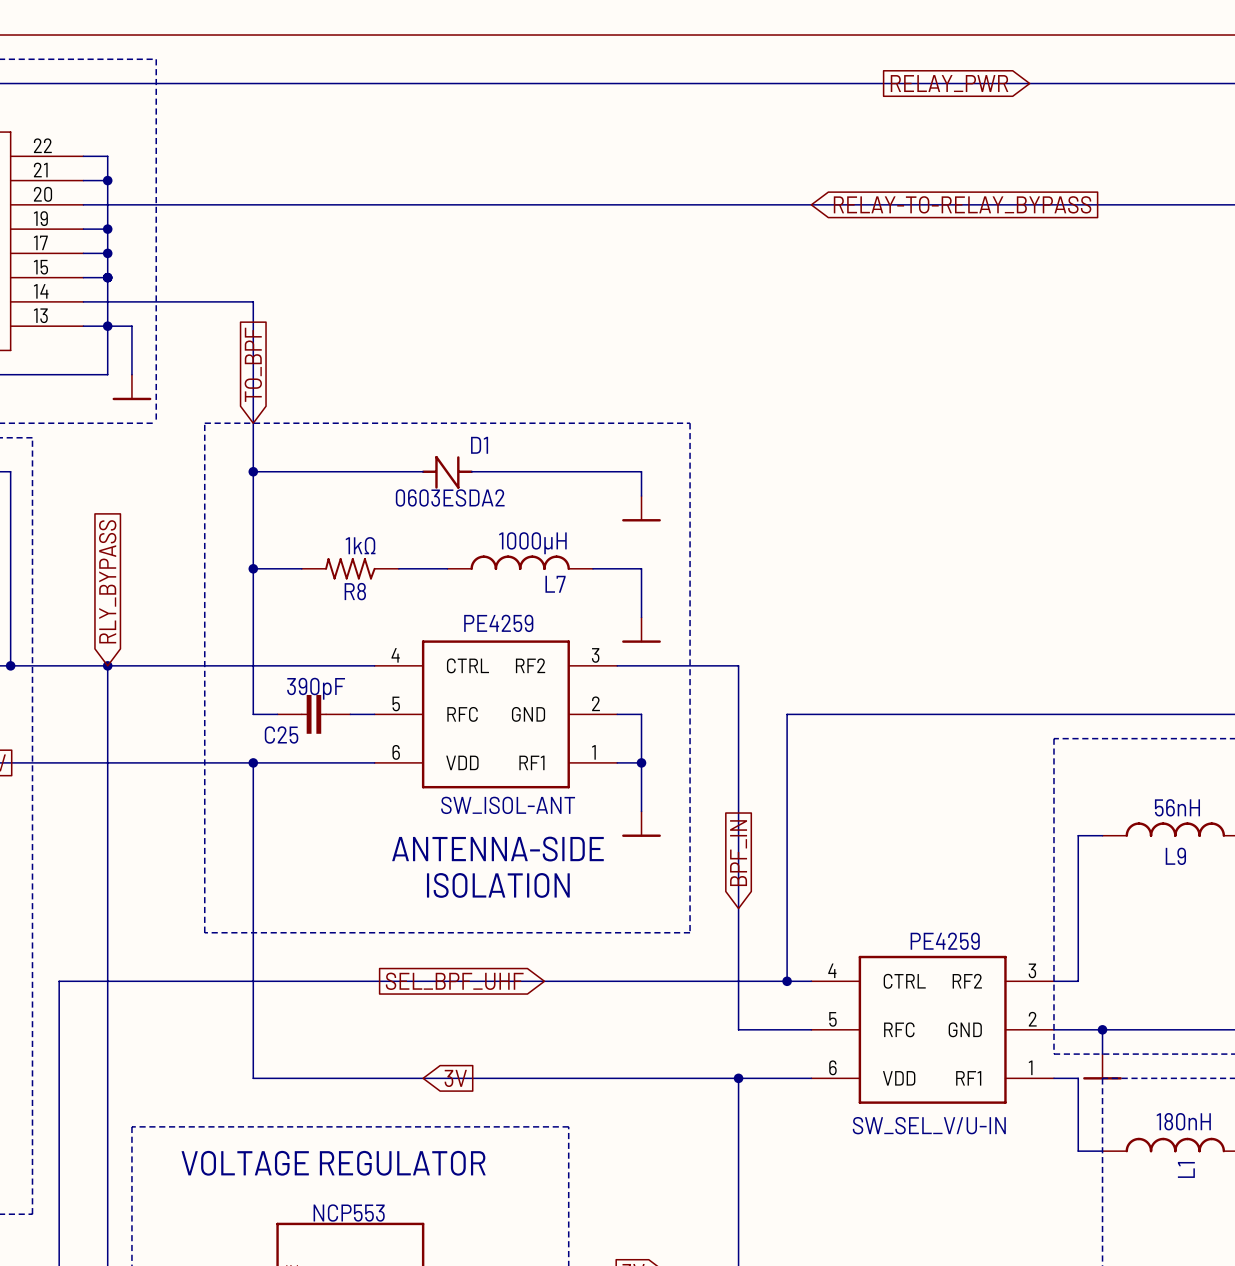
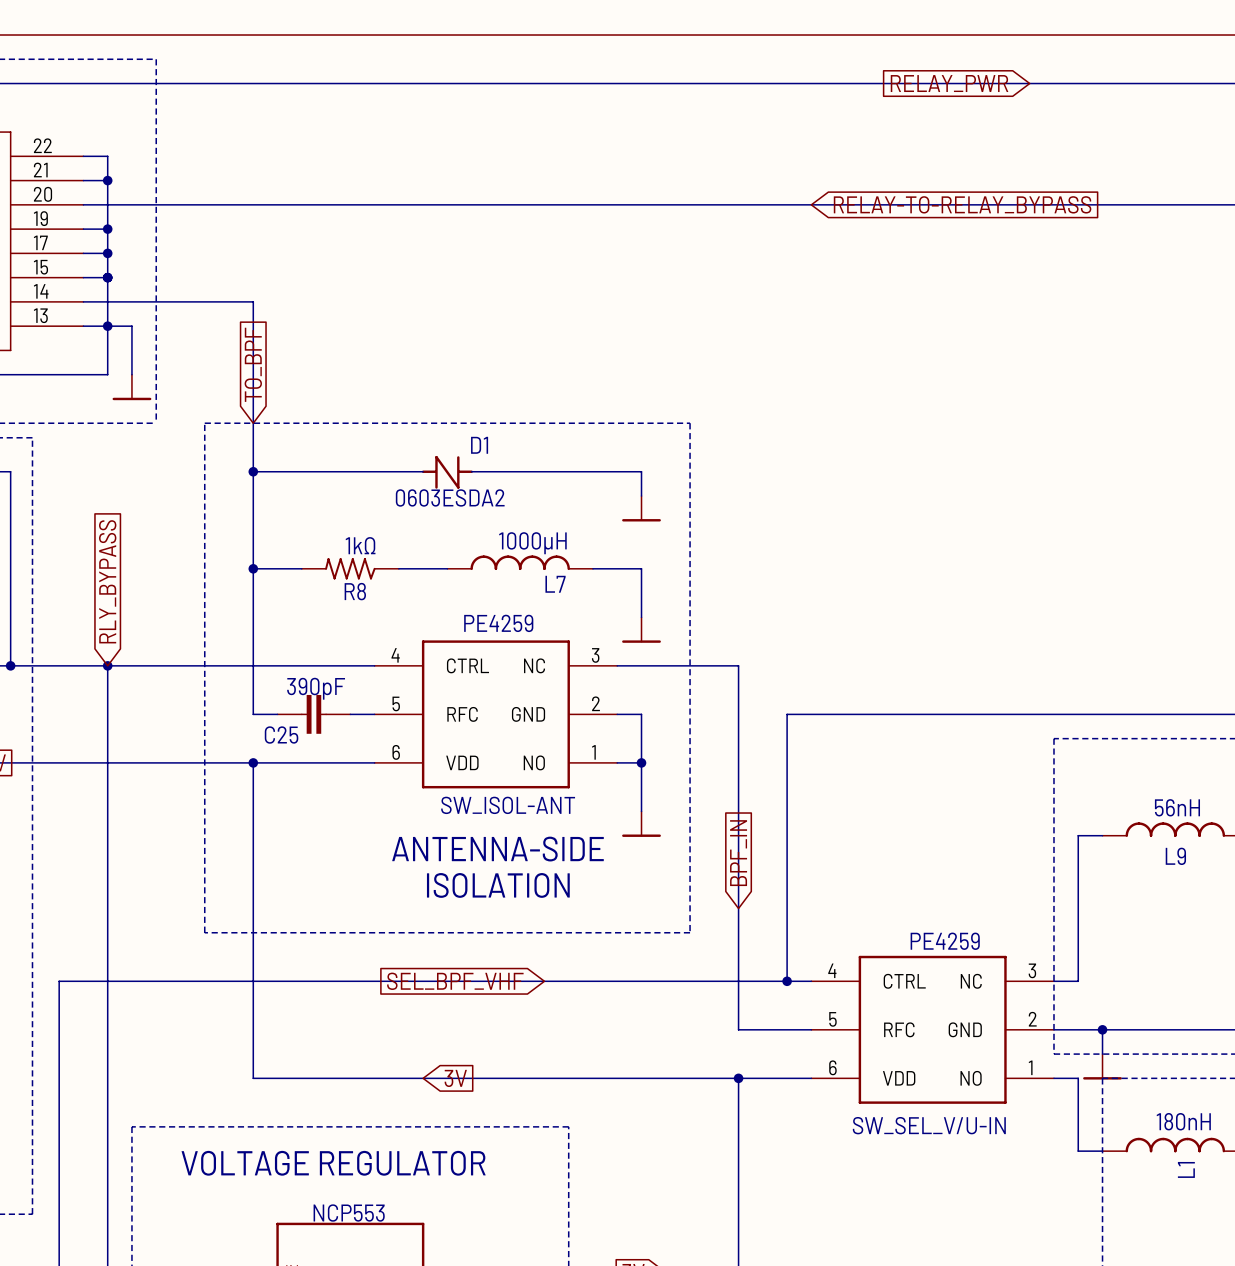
SW_ISOL-ANT pin name: RF2 (530, 665) -> NC (534, 665)
SW_ISOL-ANT pin name: RF1 (531, 762) -> NO (534, 762)
global label: SEL_BPF_UHF (454, 981) -> SEL_BPF_VHF (455, 981)
SW_SEL_V/U-IN pin name: RF2 (967, 981) -> NC (971, 981)
SW_SEL_V/U-IN pin name: RF1 (968, 1078) -> NO (971, 1078)

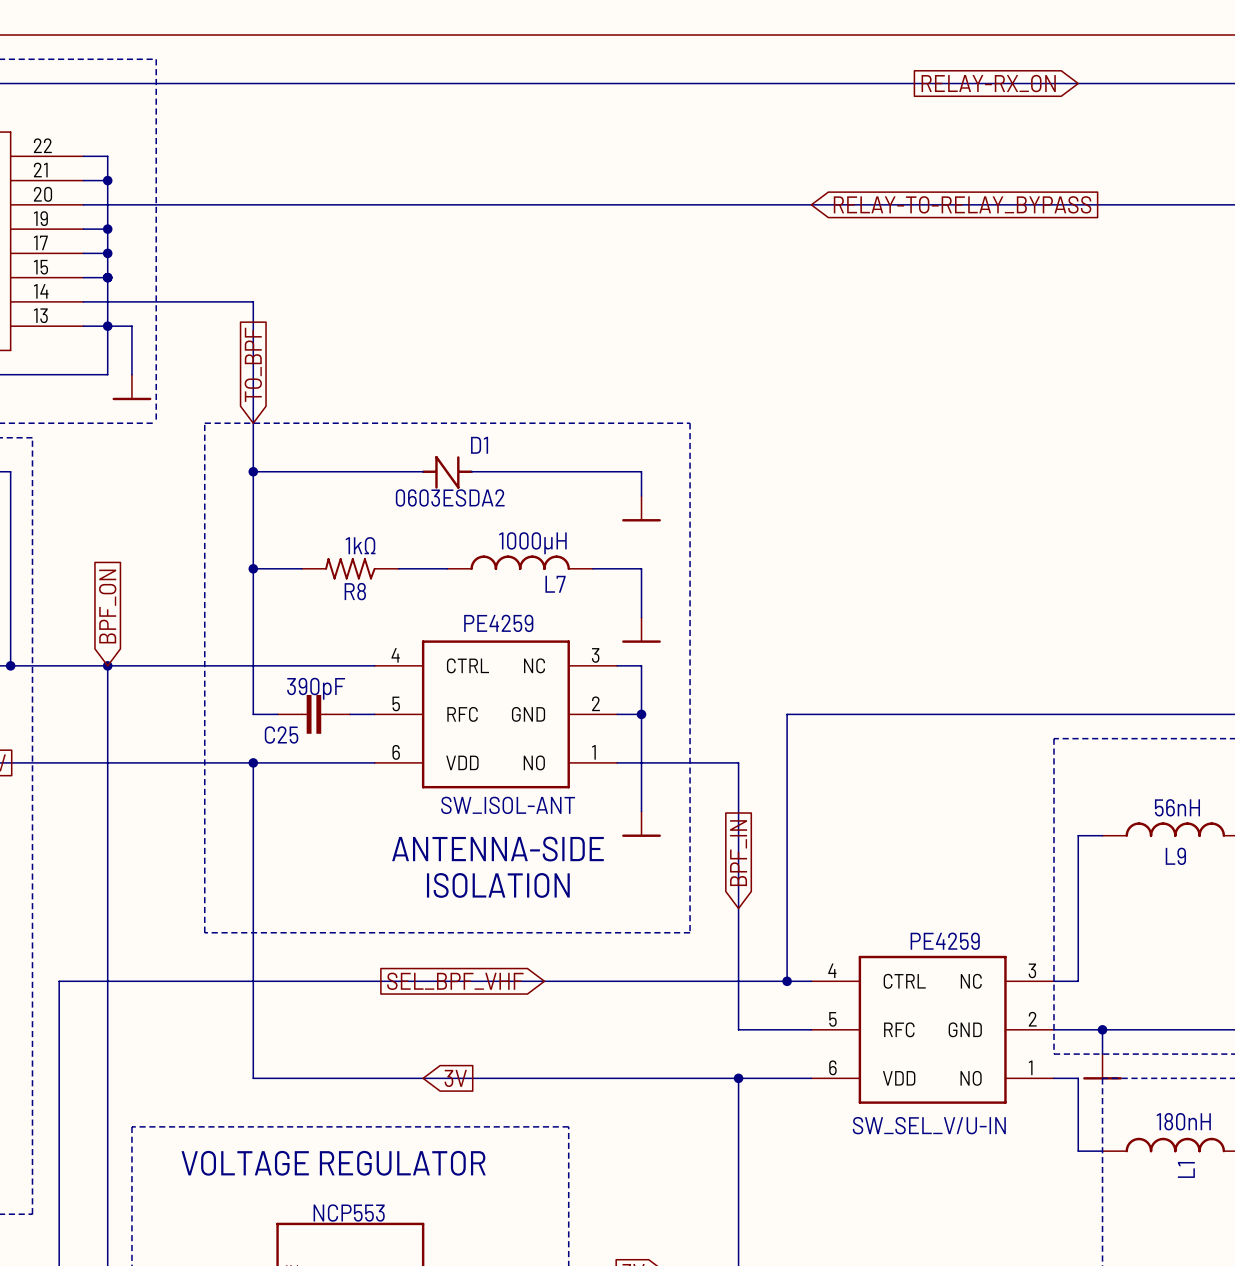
global label: RELAY_PWR (949, 83) -> none
global label: none -> RELAY-RX_ON (988, 83)
global label: RLY_BYPASS (107, 581) -> BPF_ON (107, 606)
wire: (641, 665) (738, 665) (738, 762) -> (641, 762) (738, 762)
wire: none -> (641, 665) (641, 714)
junction position: (641, 762) -> (641, 714)

